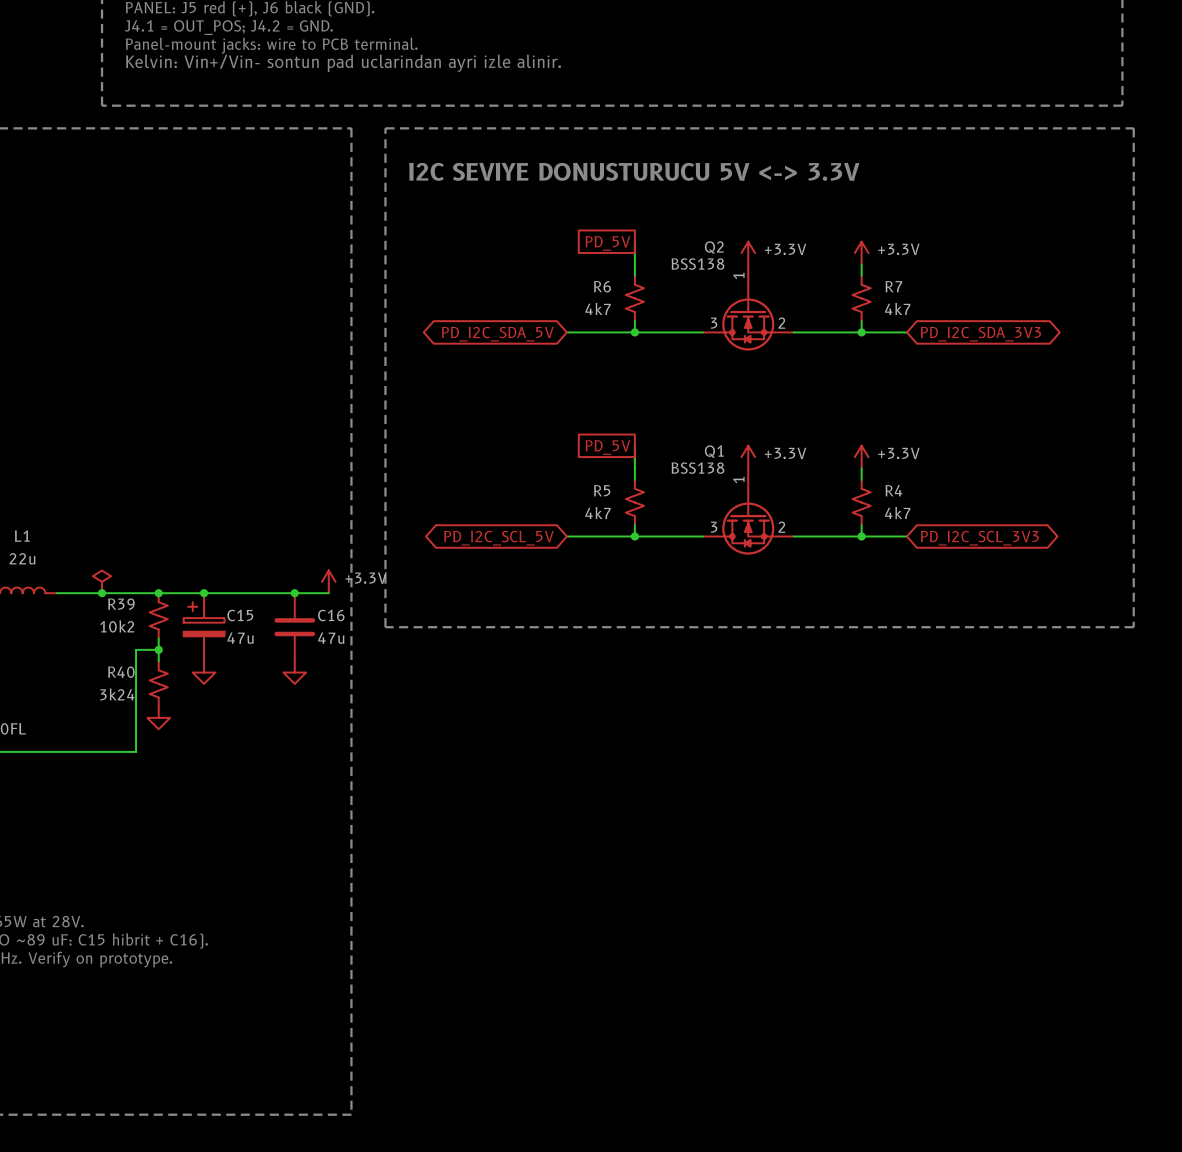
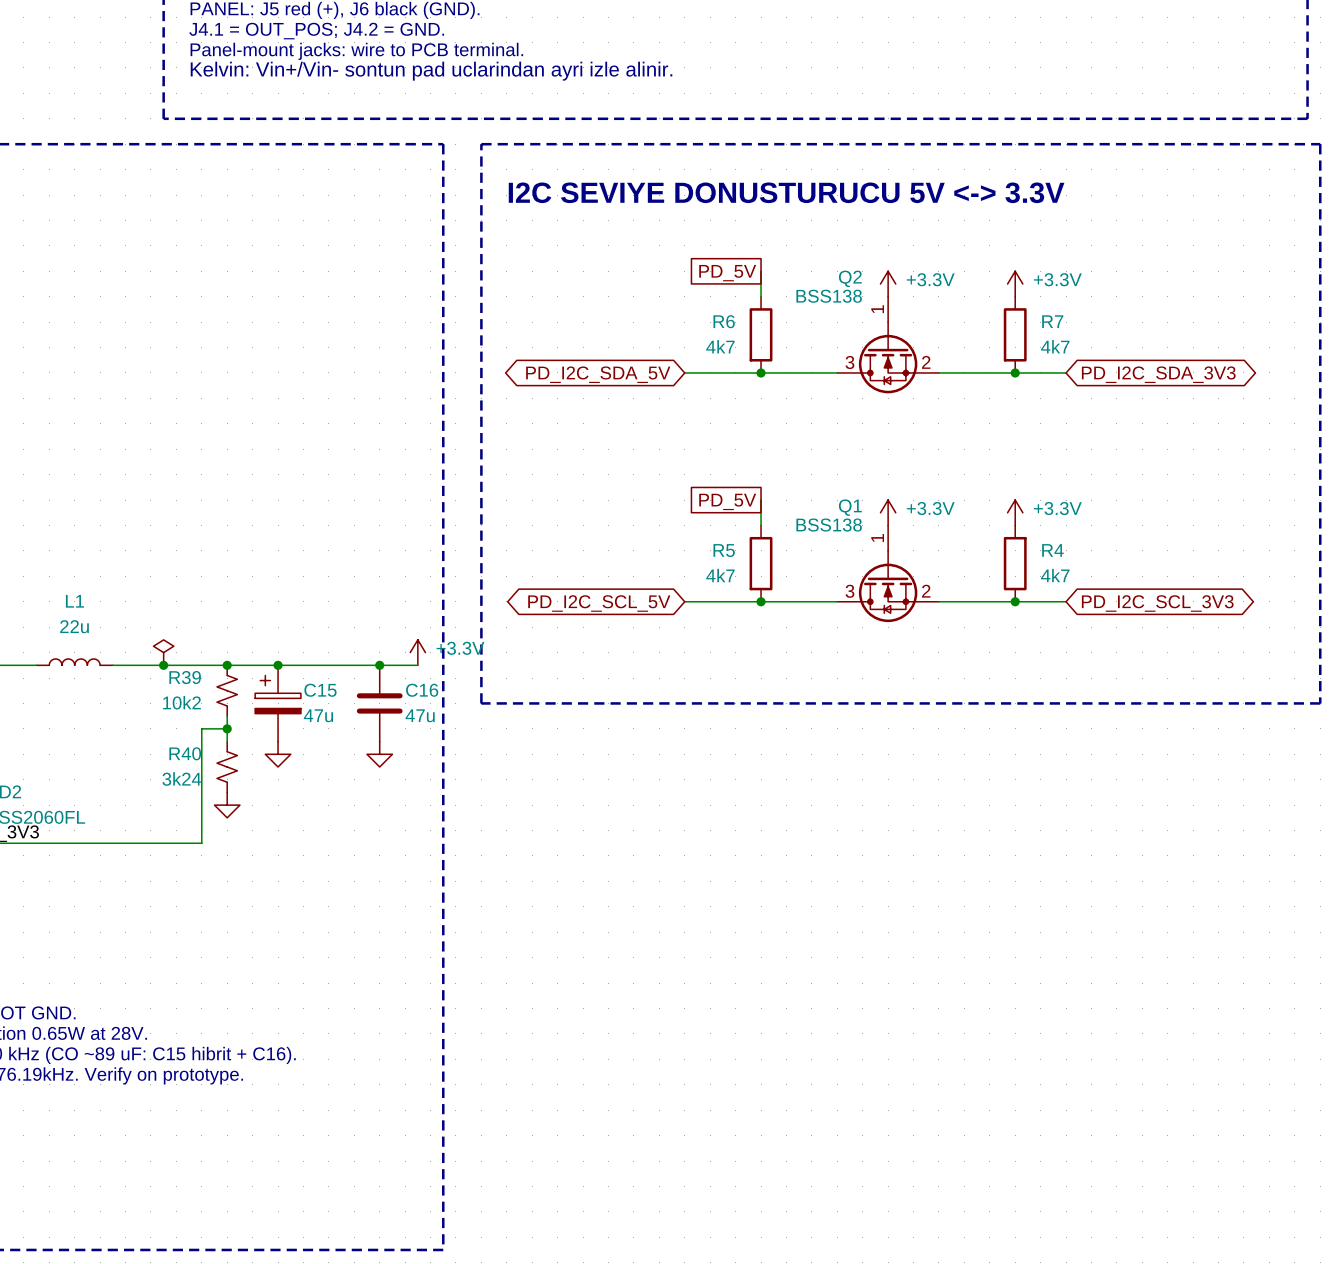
R6 symbol: [625, 275, 644, 322] -> [749, 296, 773, 373]
R7 symbol: [852, 275, 871, 322] -> [1003, 296, 1027, 373]
R5 symbol: [625, 479, 644, 526] -> [749, 525, 773, 602]
R4 symbol: [852, 479, 871, 526] -> [1003, 525, 1027, 602]

